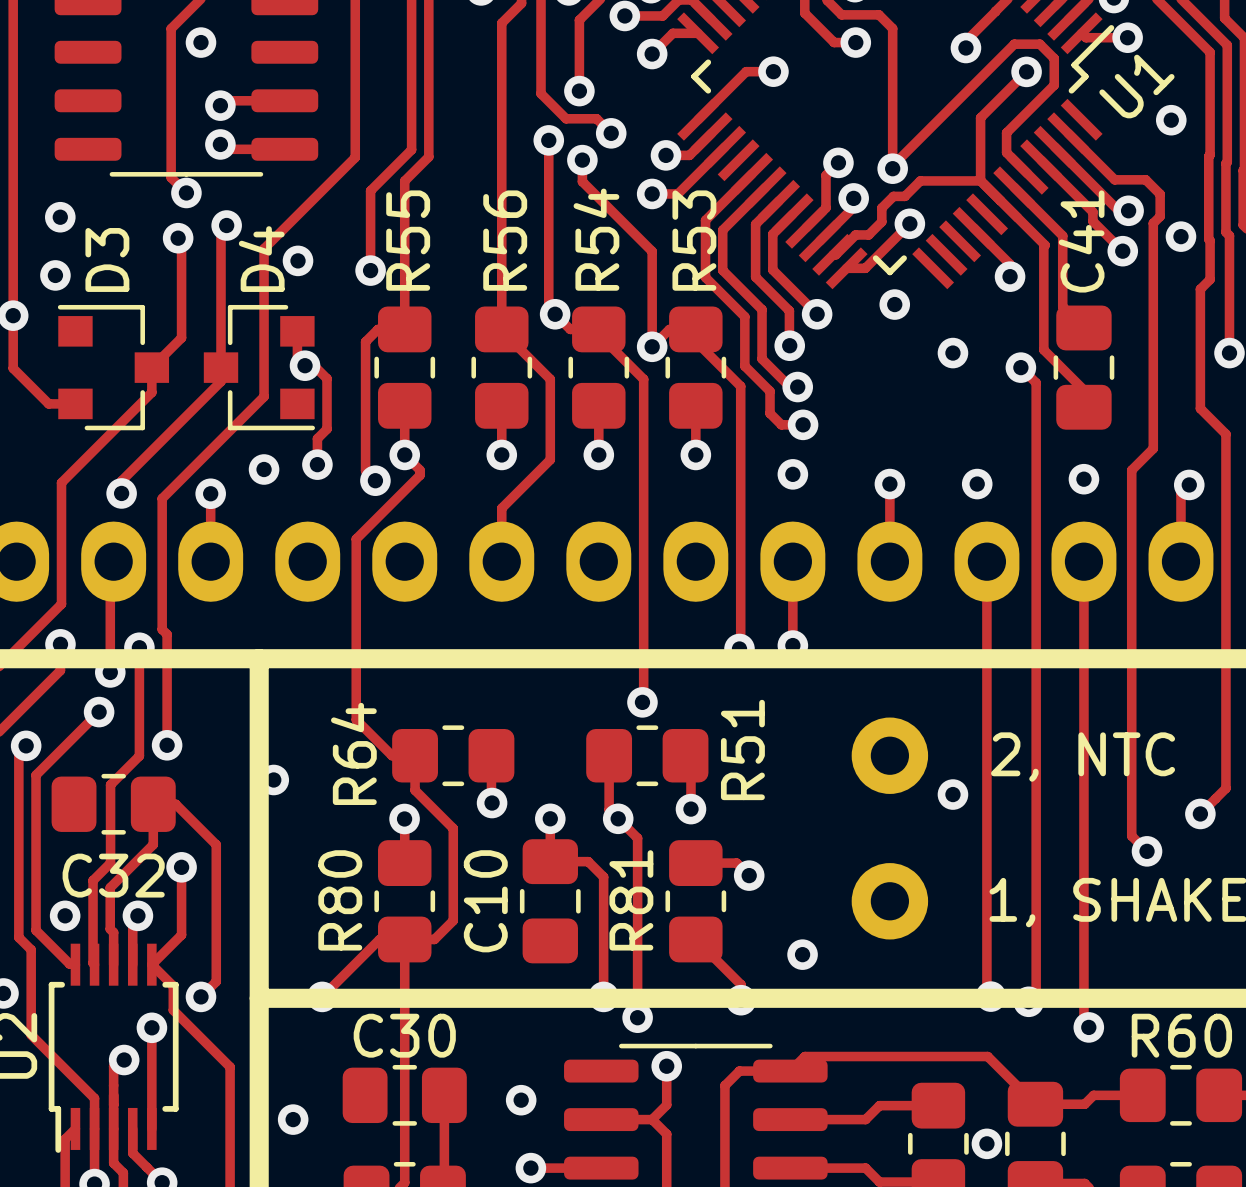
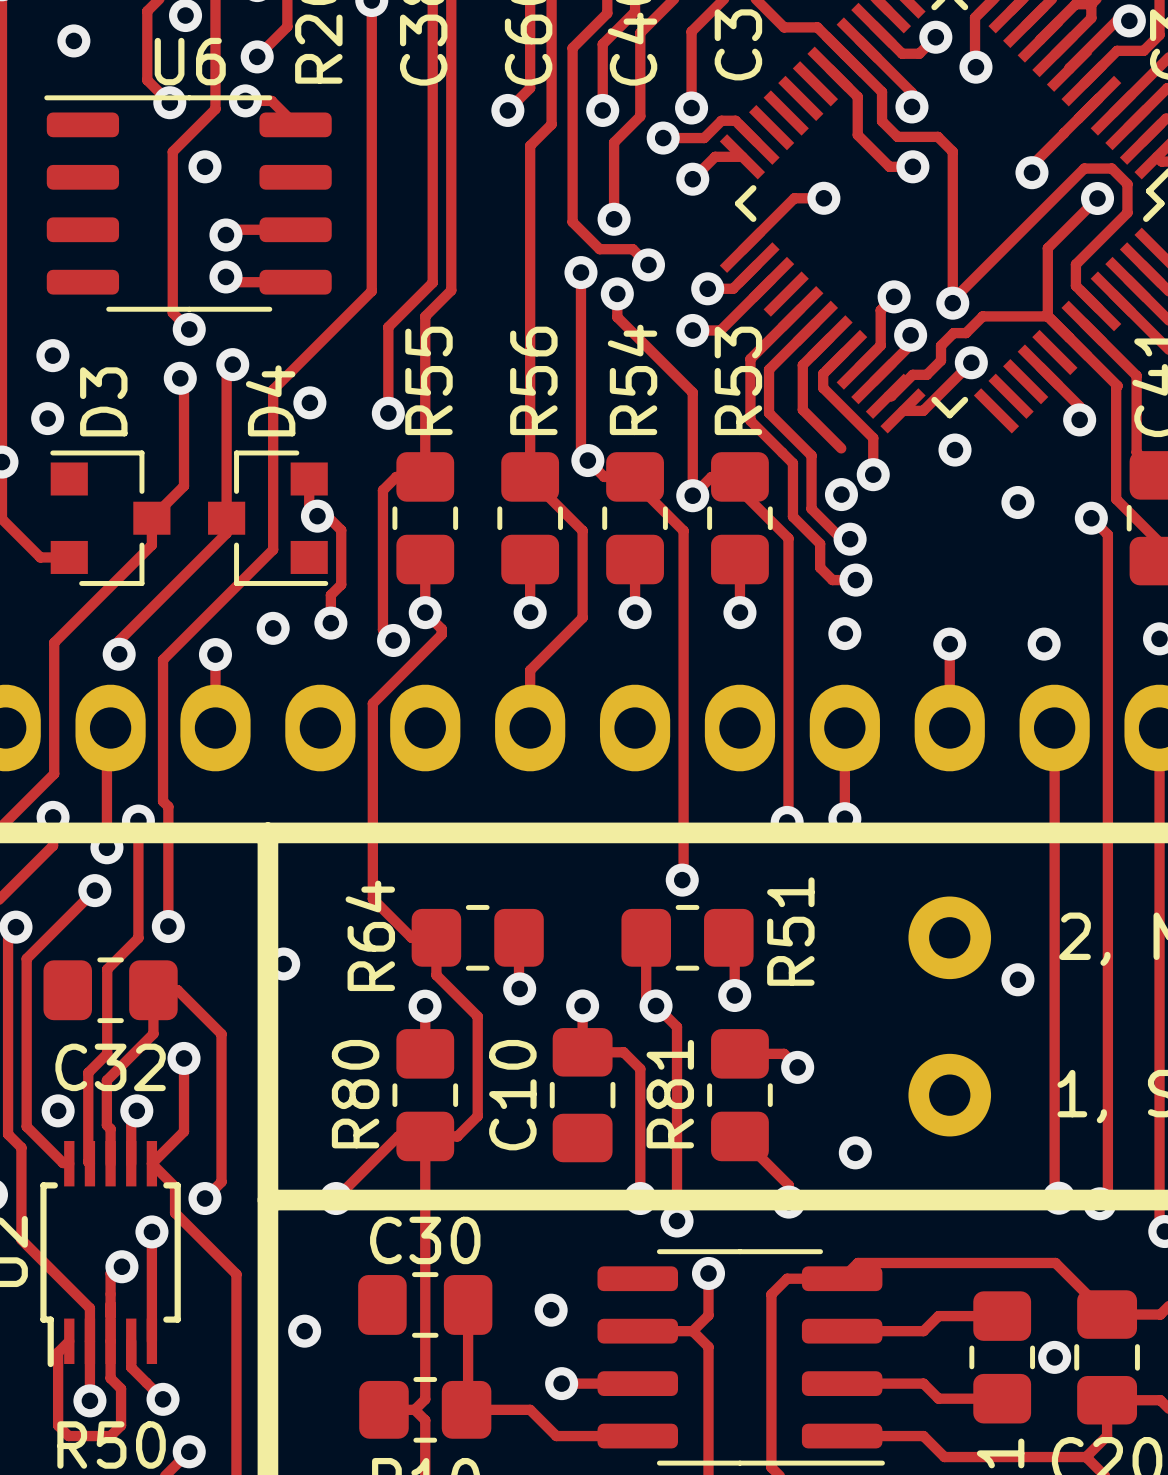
track: (755, 224) (755, 277) (789, 310) (789, 335) (792, 338) -> (804, 363) (802, 365) (802, 409) (841, 448)
track: (772, 247) (772, 269) (817, 314) -> (823, 387) (873, 438) (873, 474)
via position: (817, 314) -> (873, 474)

